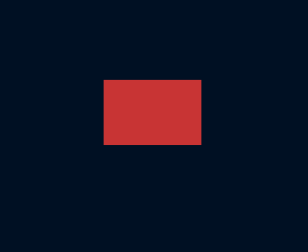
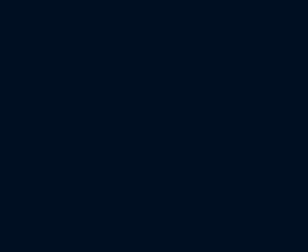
part: (152, 112) -> none

